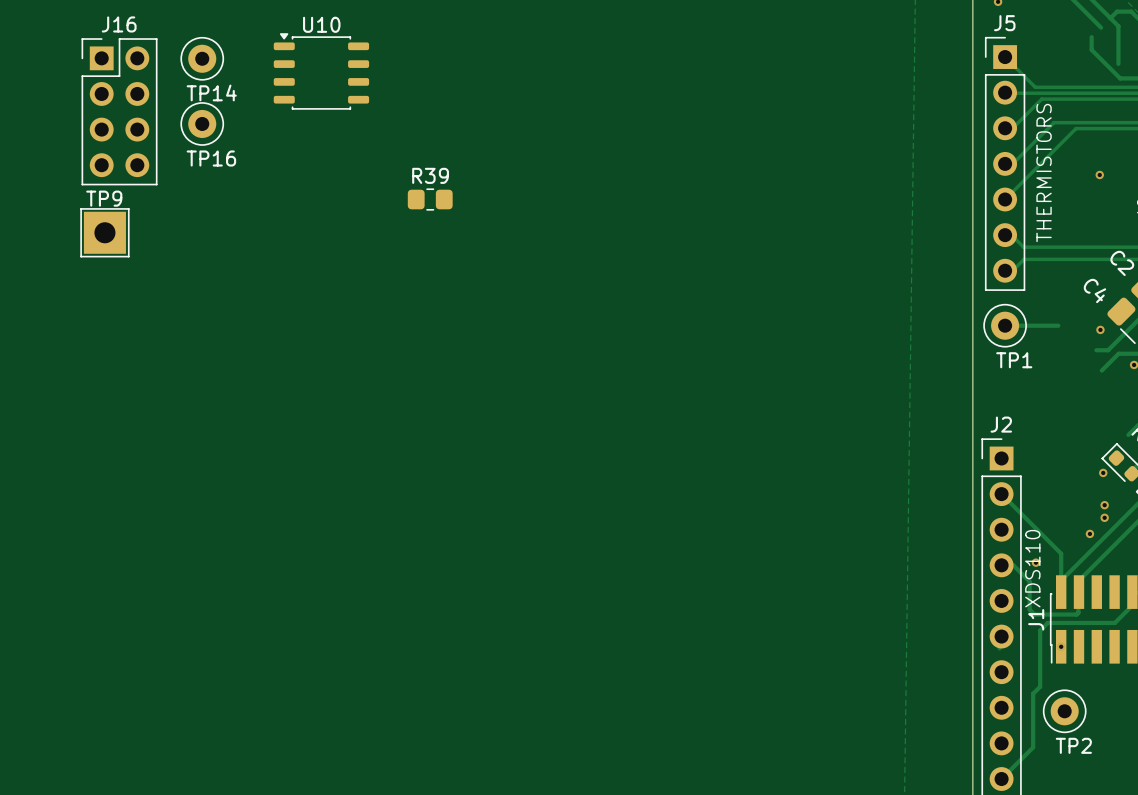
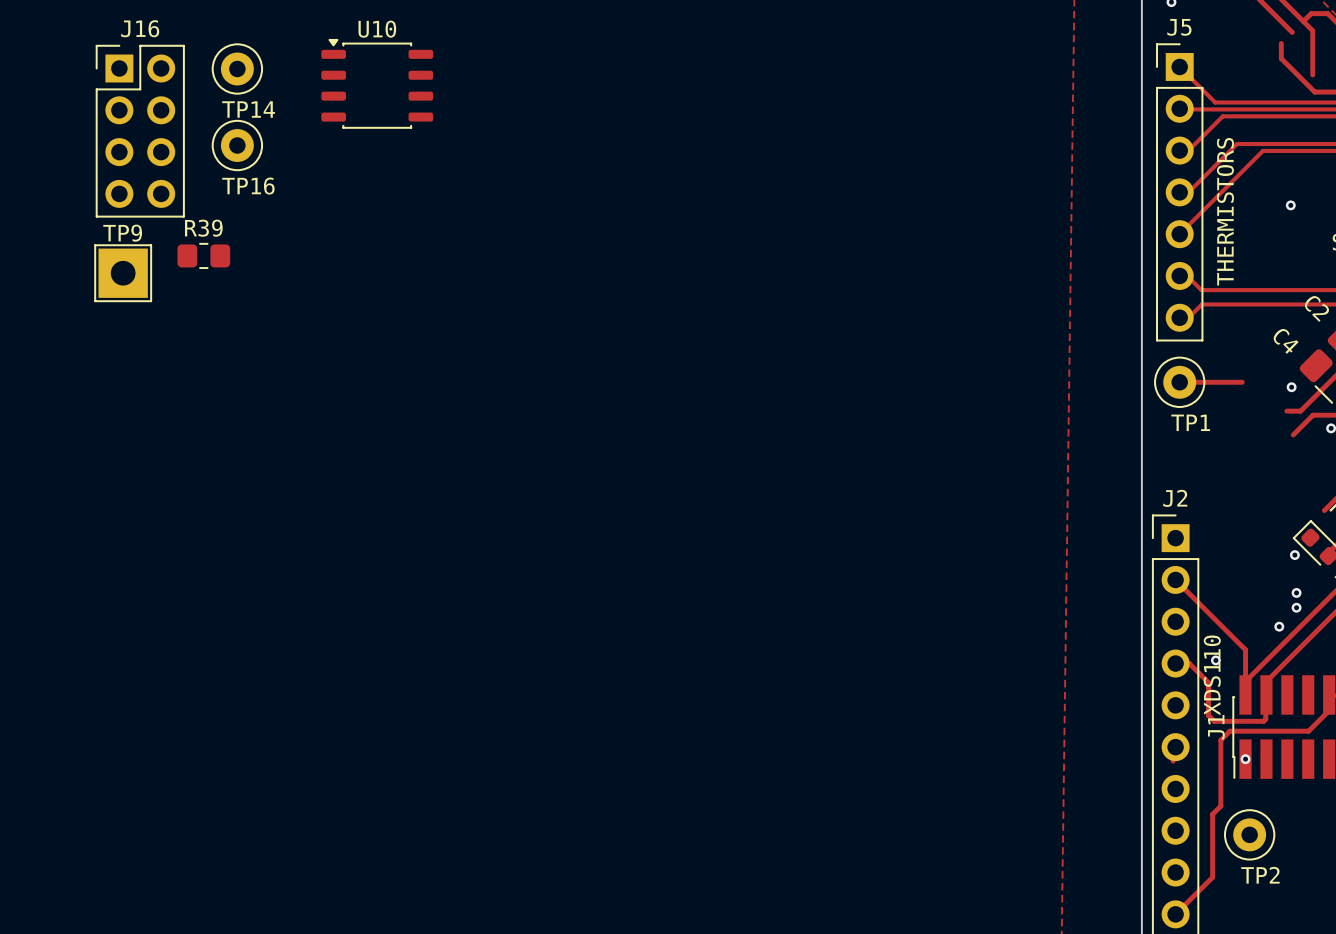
R39 position: (430, 199) -> (203, 255)

